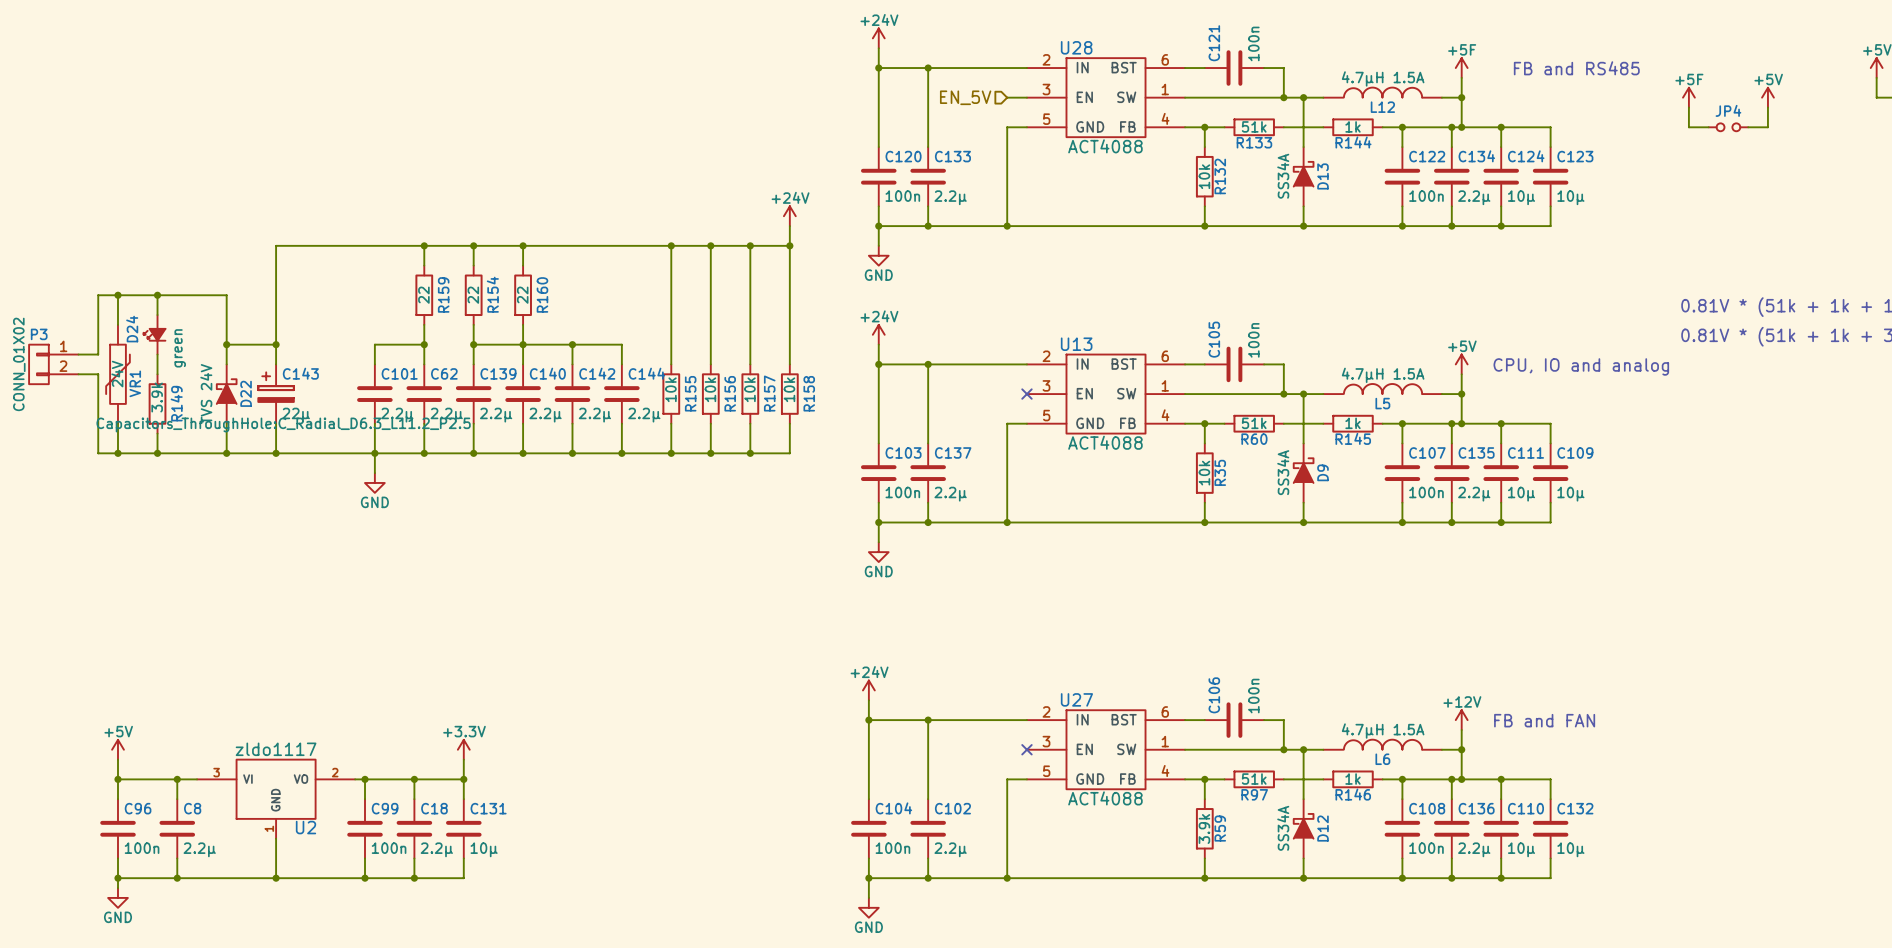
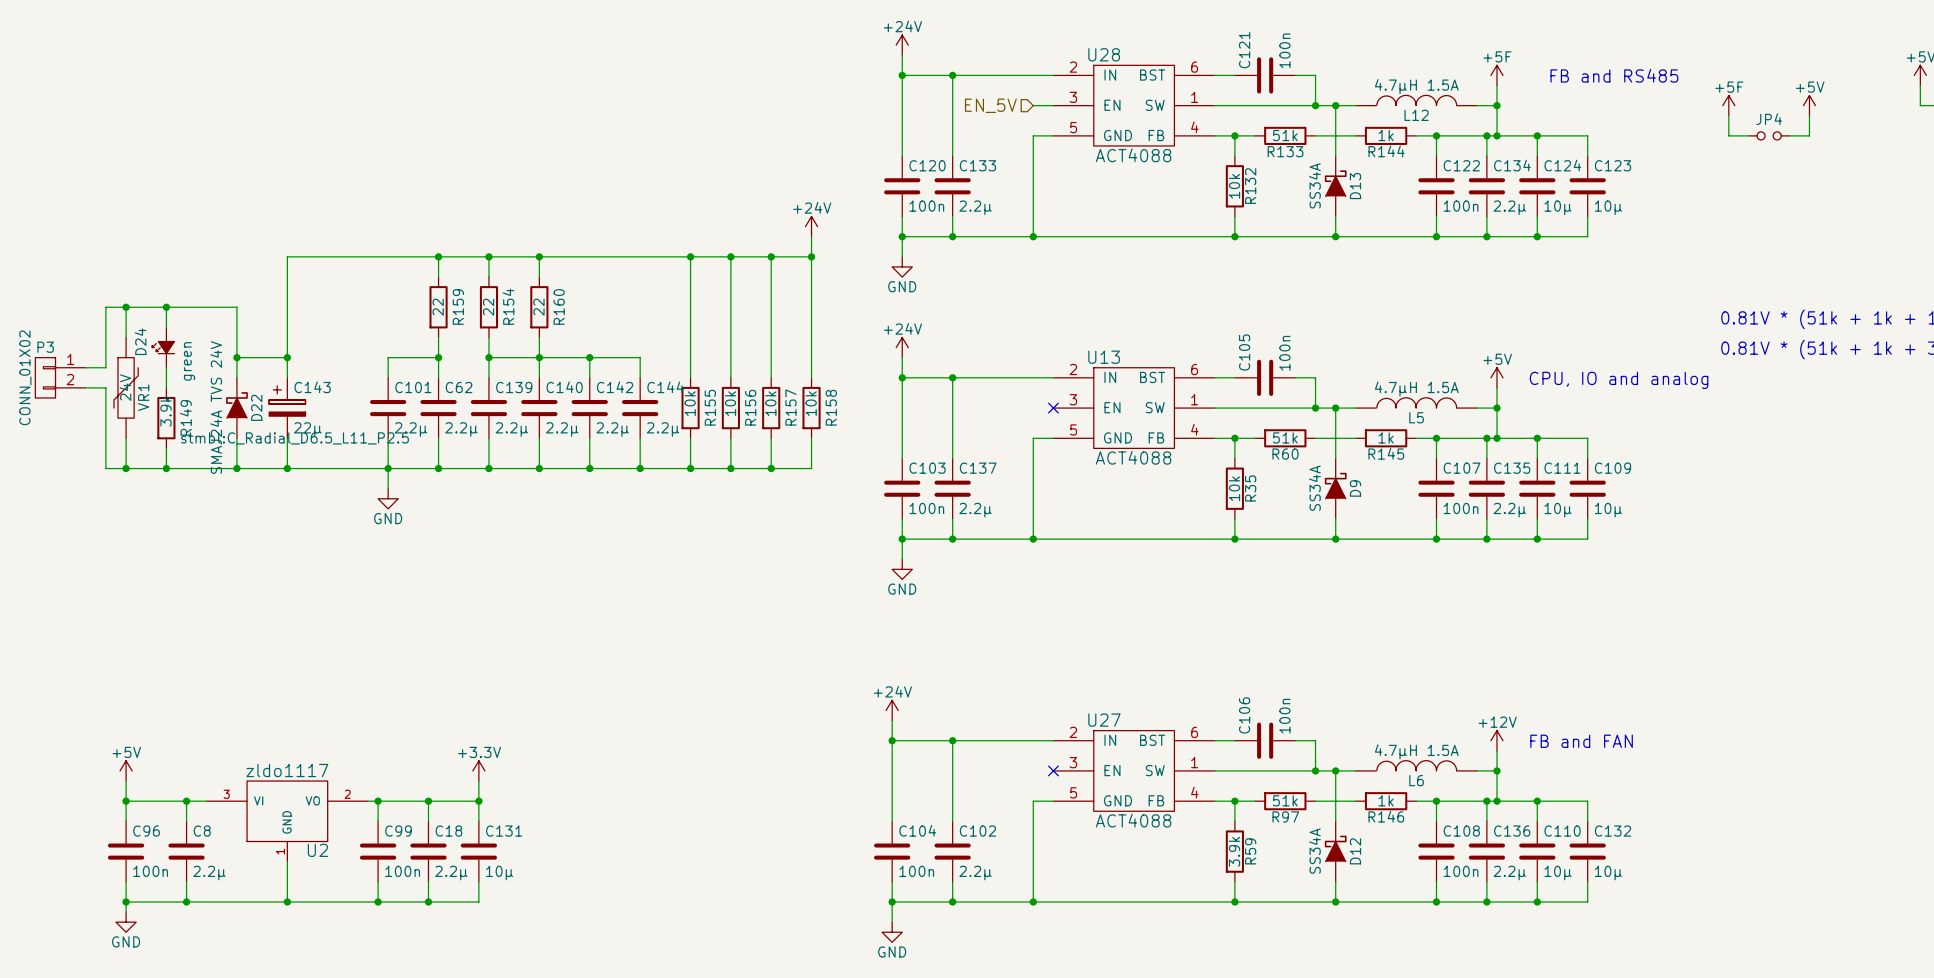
D22 value: TVS 24V (206, 394) -> SMAJ24A TVS 24V (216, 407)
C143 text: Capacitors_ThroughHole:C_Radial_D6.3_L11.2_P2.5 (283, 424) -> stmbl:C_Radial_D6.5_L11_P2.5 (295, 438)

